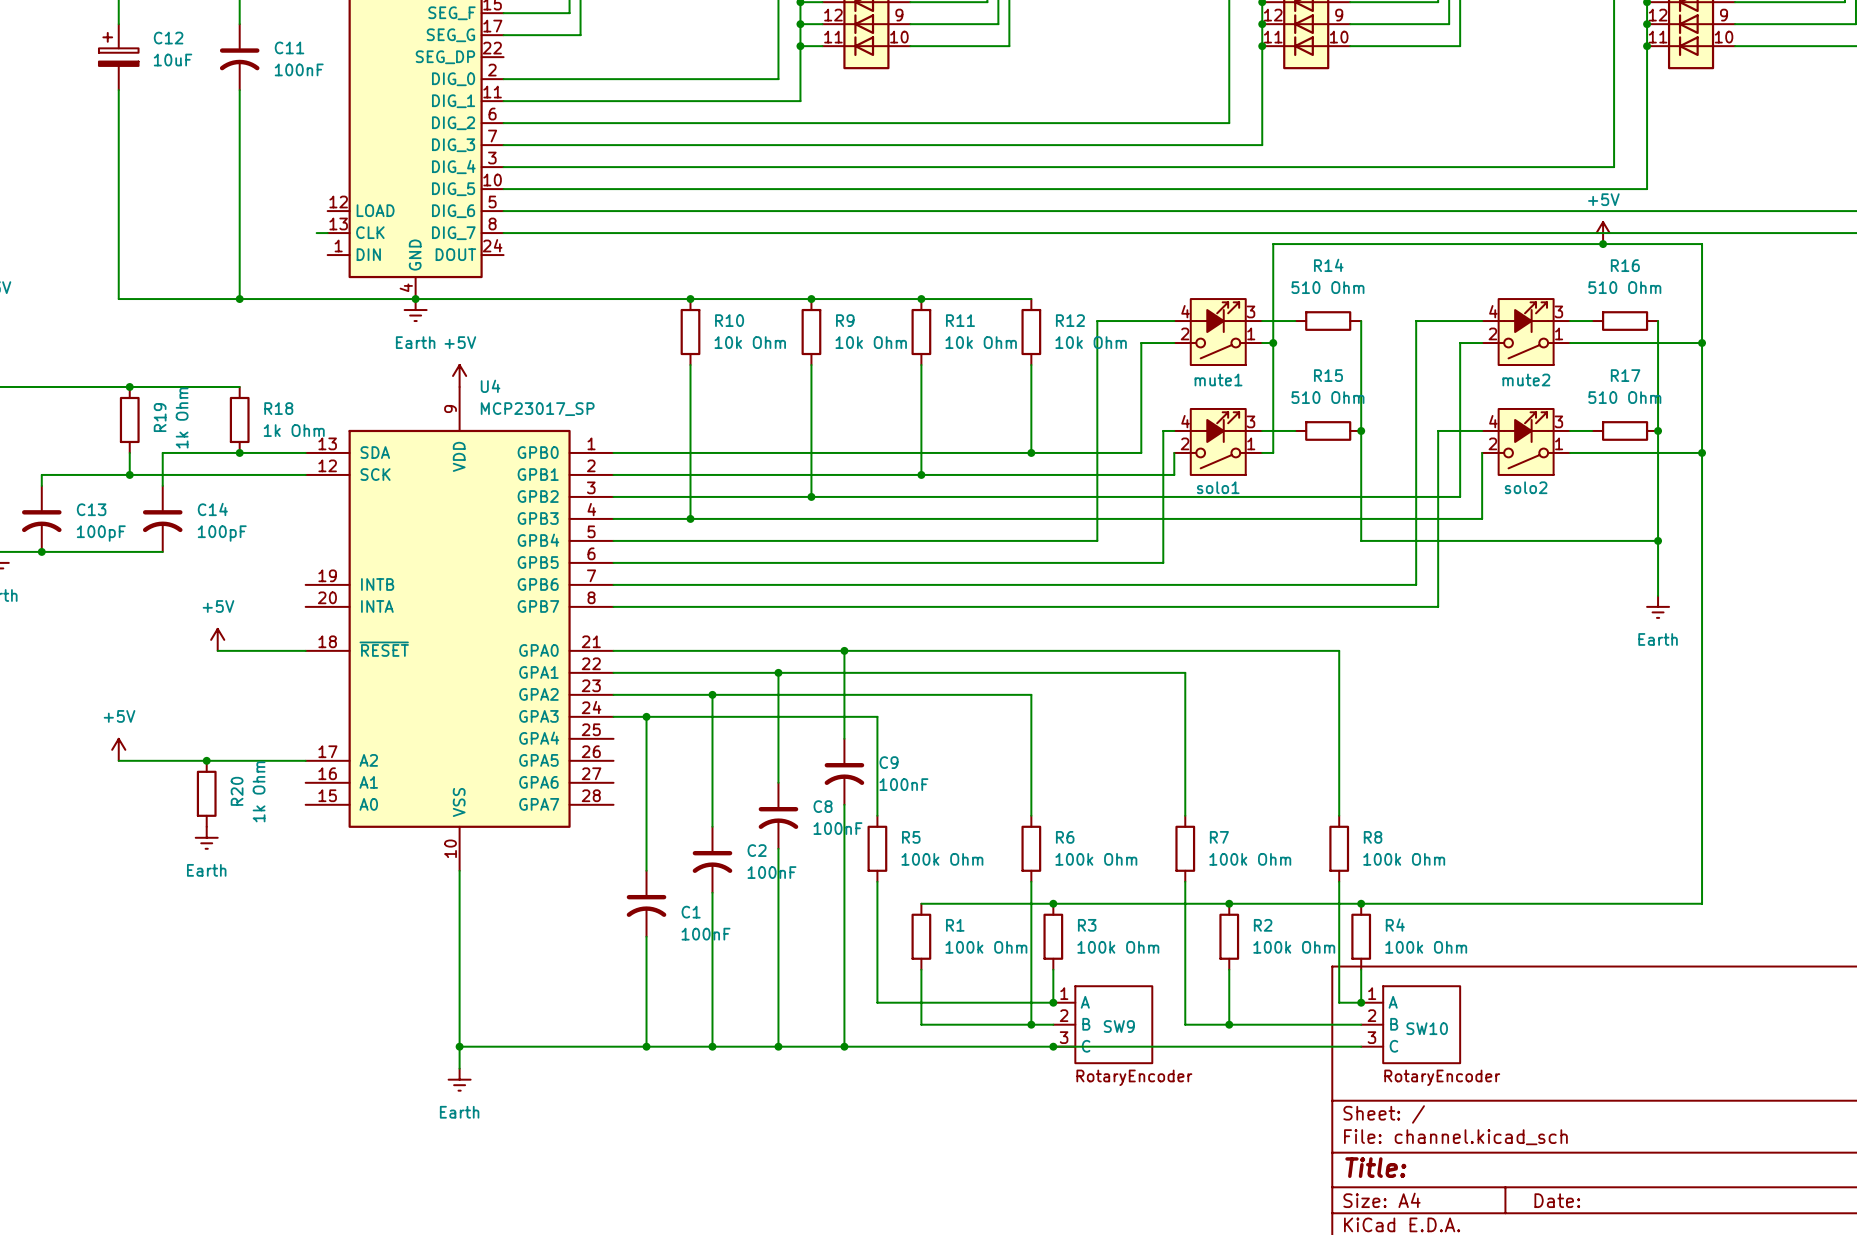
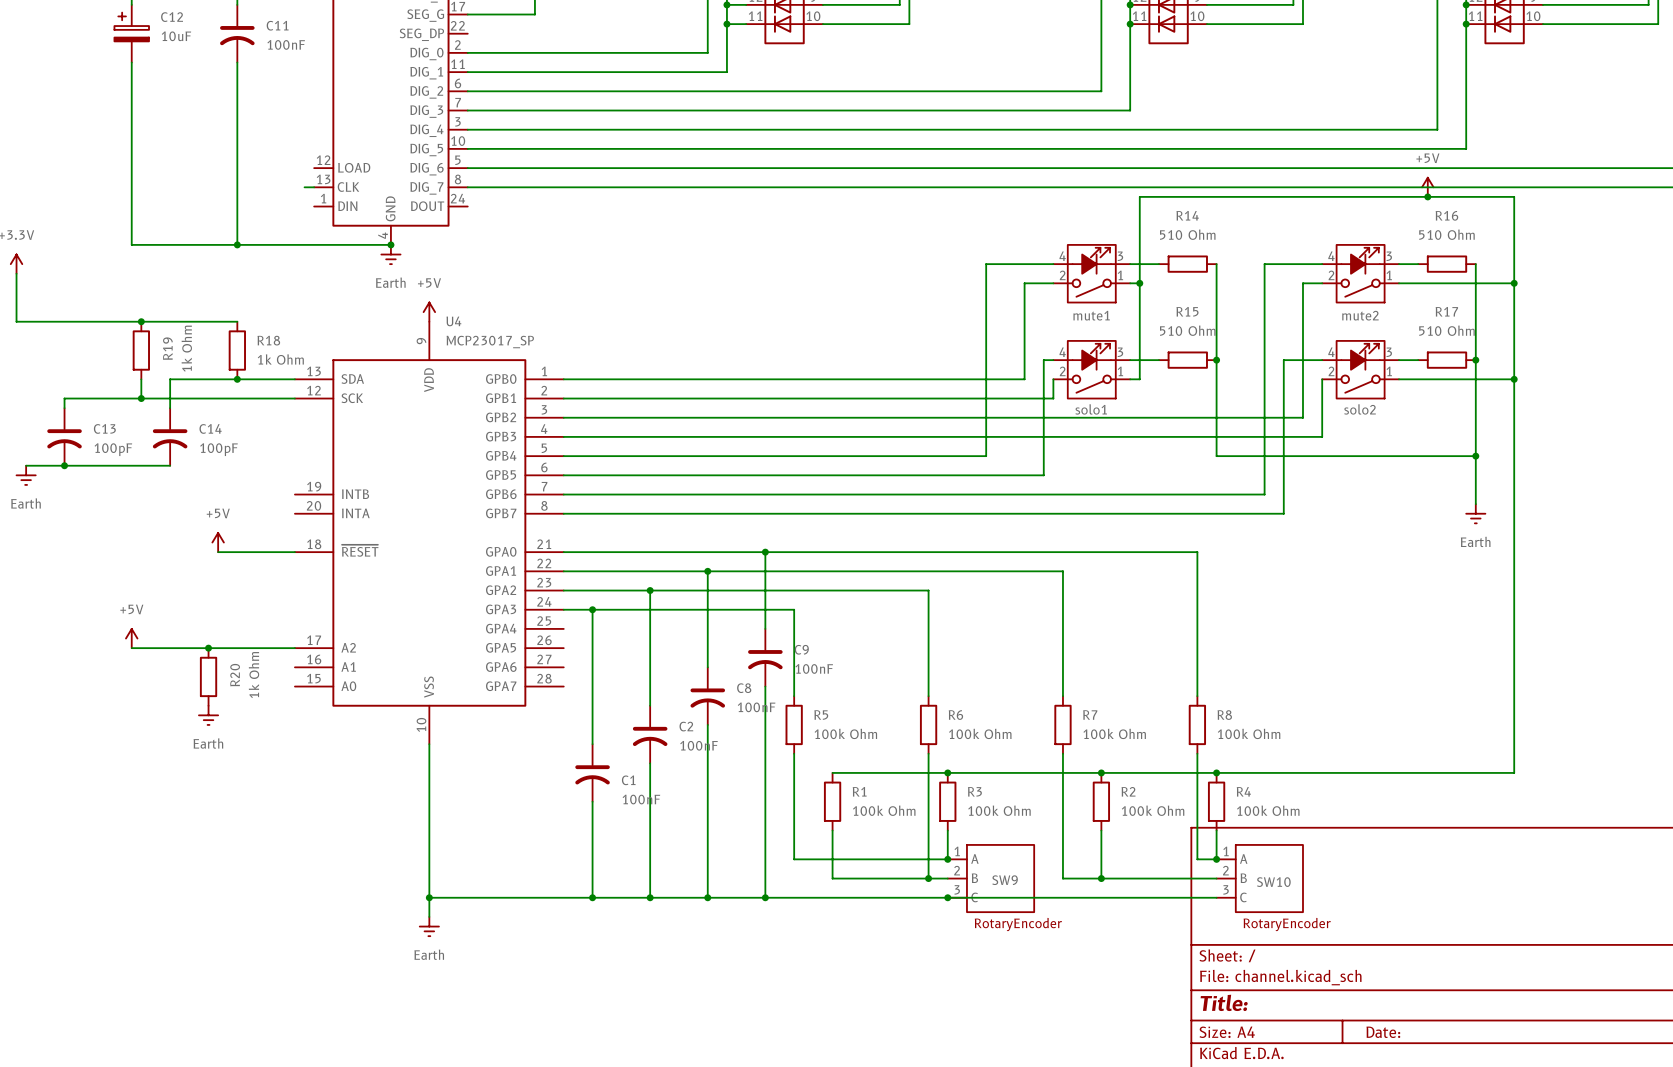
wire: (415, 299) (1031, 299) -> none
junction: (690, 299) -> none
junction: (811, 299) -> none
junction: (921, 299) -> none
R10: 10k Ohm (690, 332) -> none
R9: 10k Ohm (811, 332) -> none
R11: 10k Ohm (921, 332) -> none
R12: 10k Ohm (1031, 332) -> none
wire: (690, 365) (690, 518) -> none
wire: (811, 365) (811, 496) -> none
wire: (921, 365) (921, 474) -> none
wire: (1031, 365) (1031, 452) -> none
junction: (1031, 452) -> none
junction: (921, 474) -> none
junction: (811, 496) -> none
junction: (690, 518) -> none

